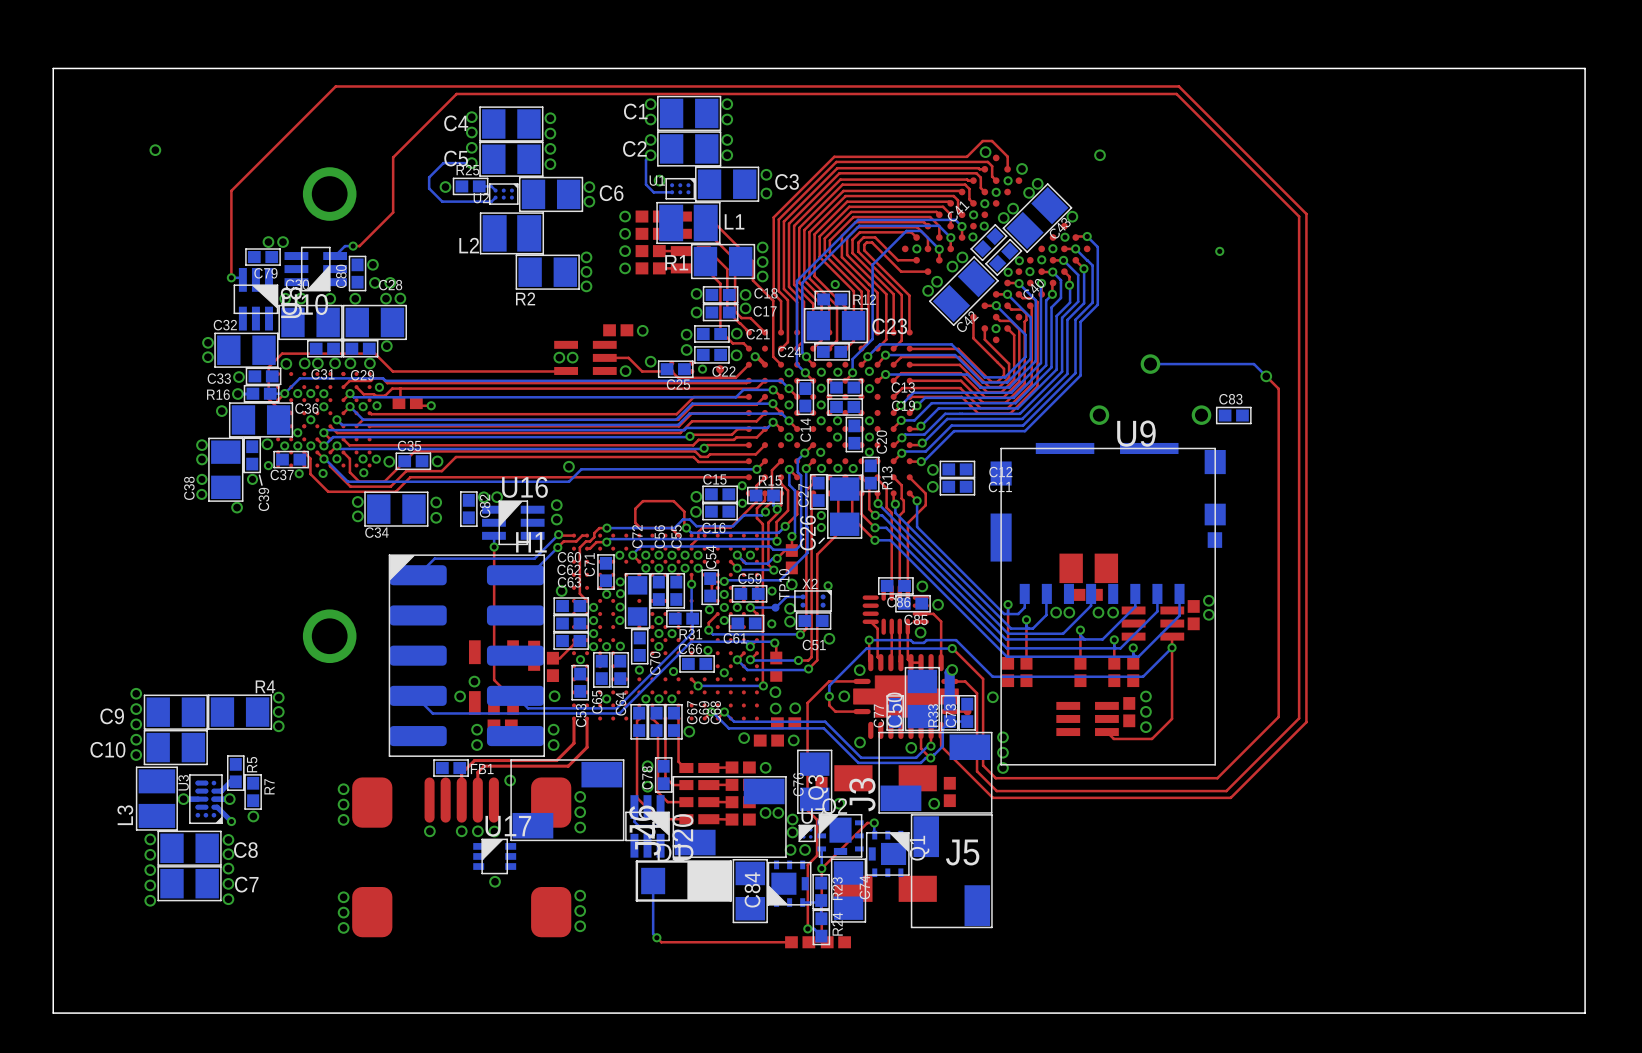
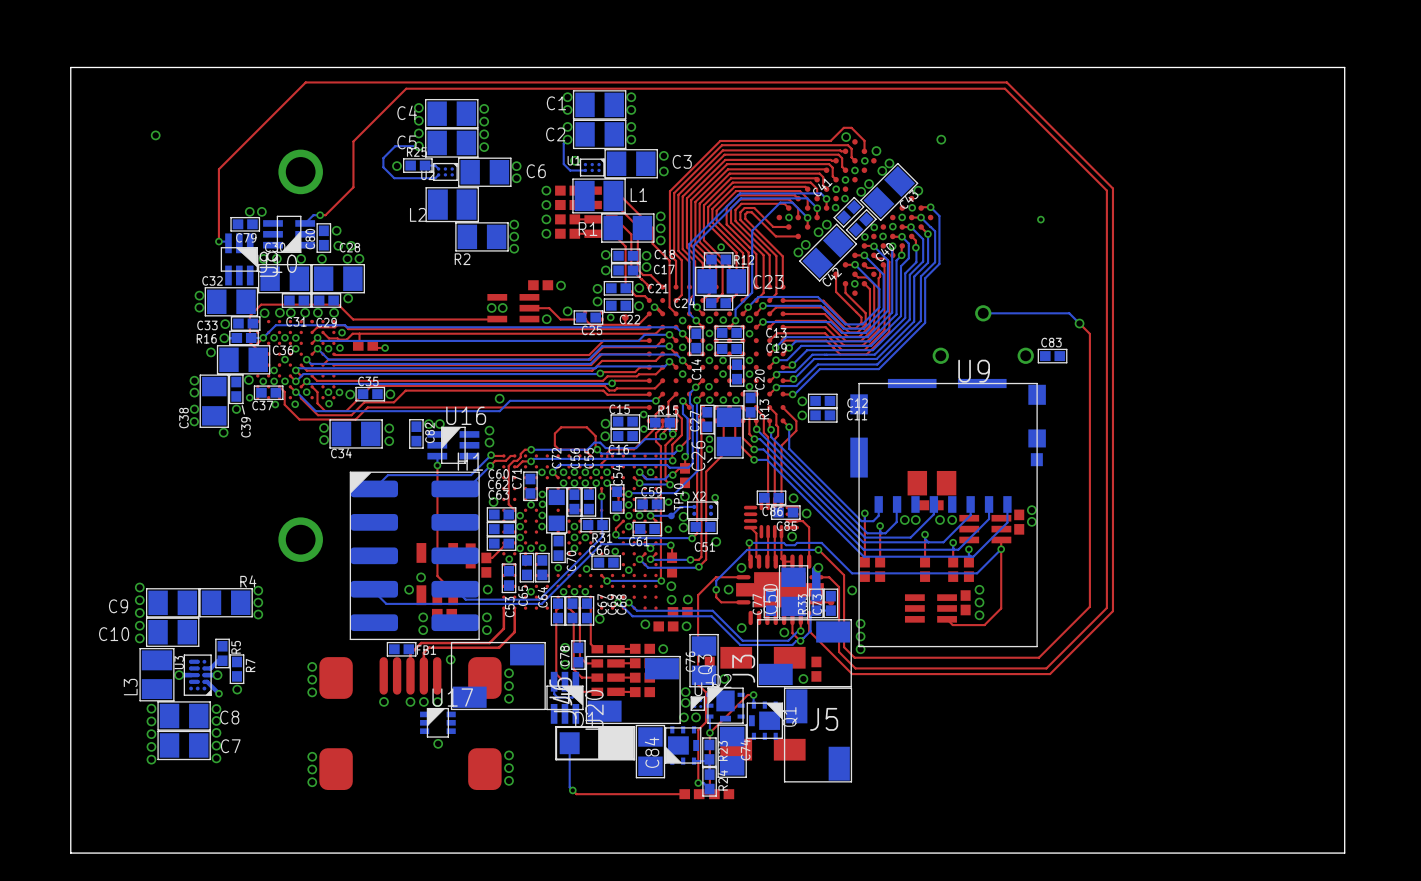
via: (765, 812) -> none
via: (778, 812) -> none

